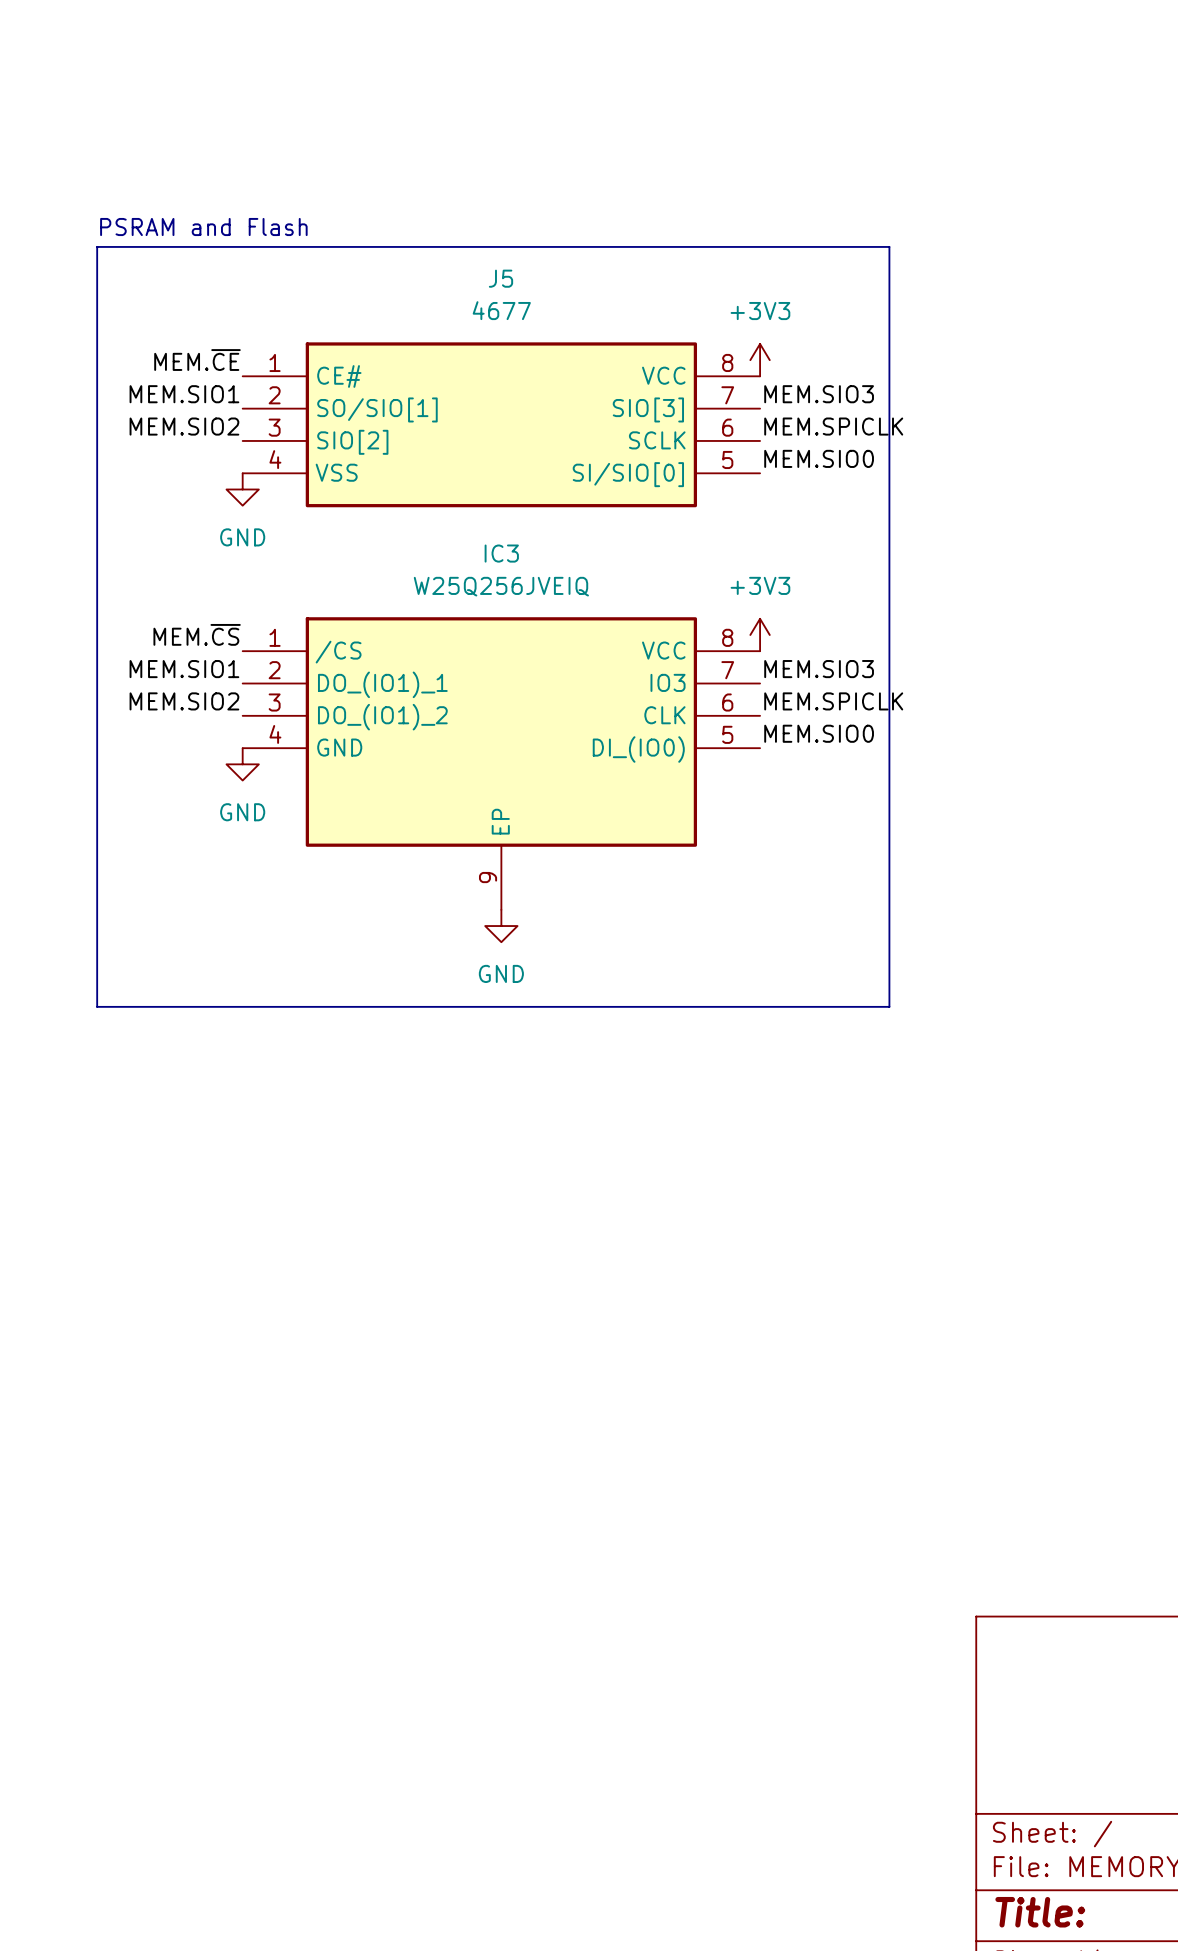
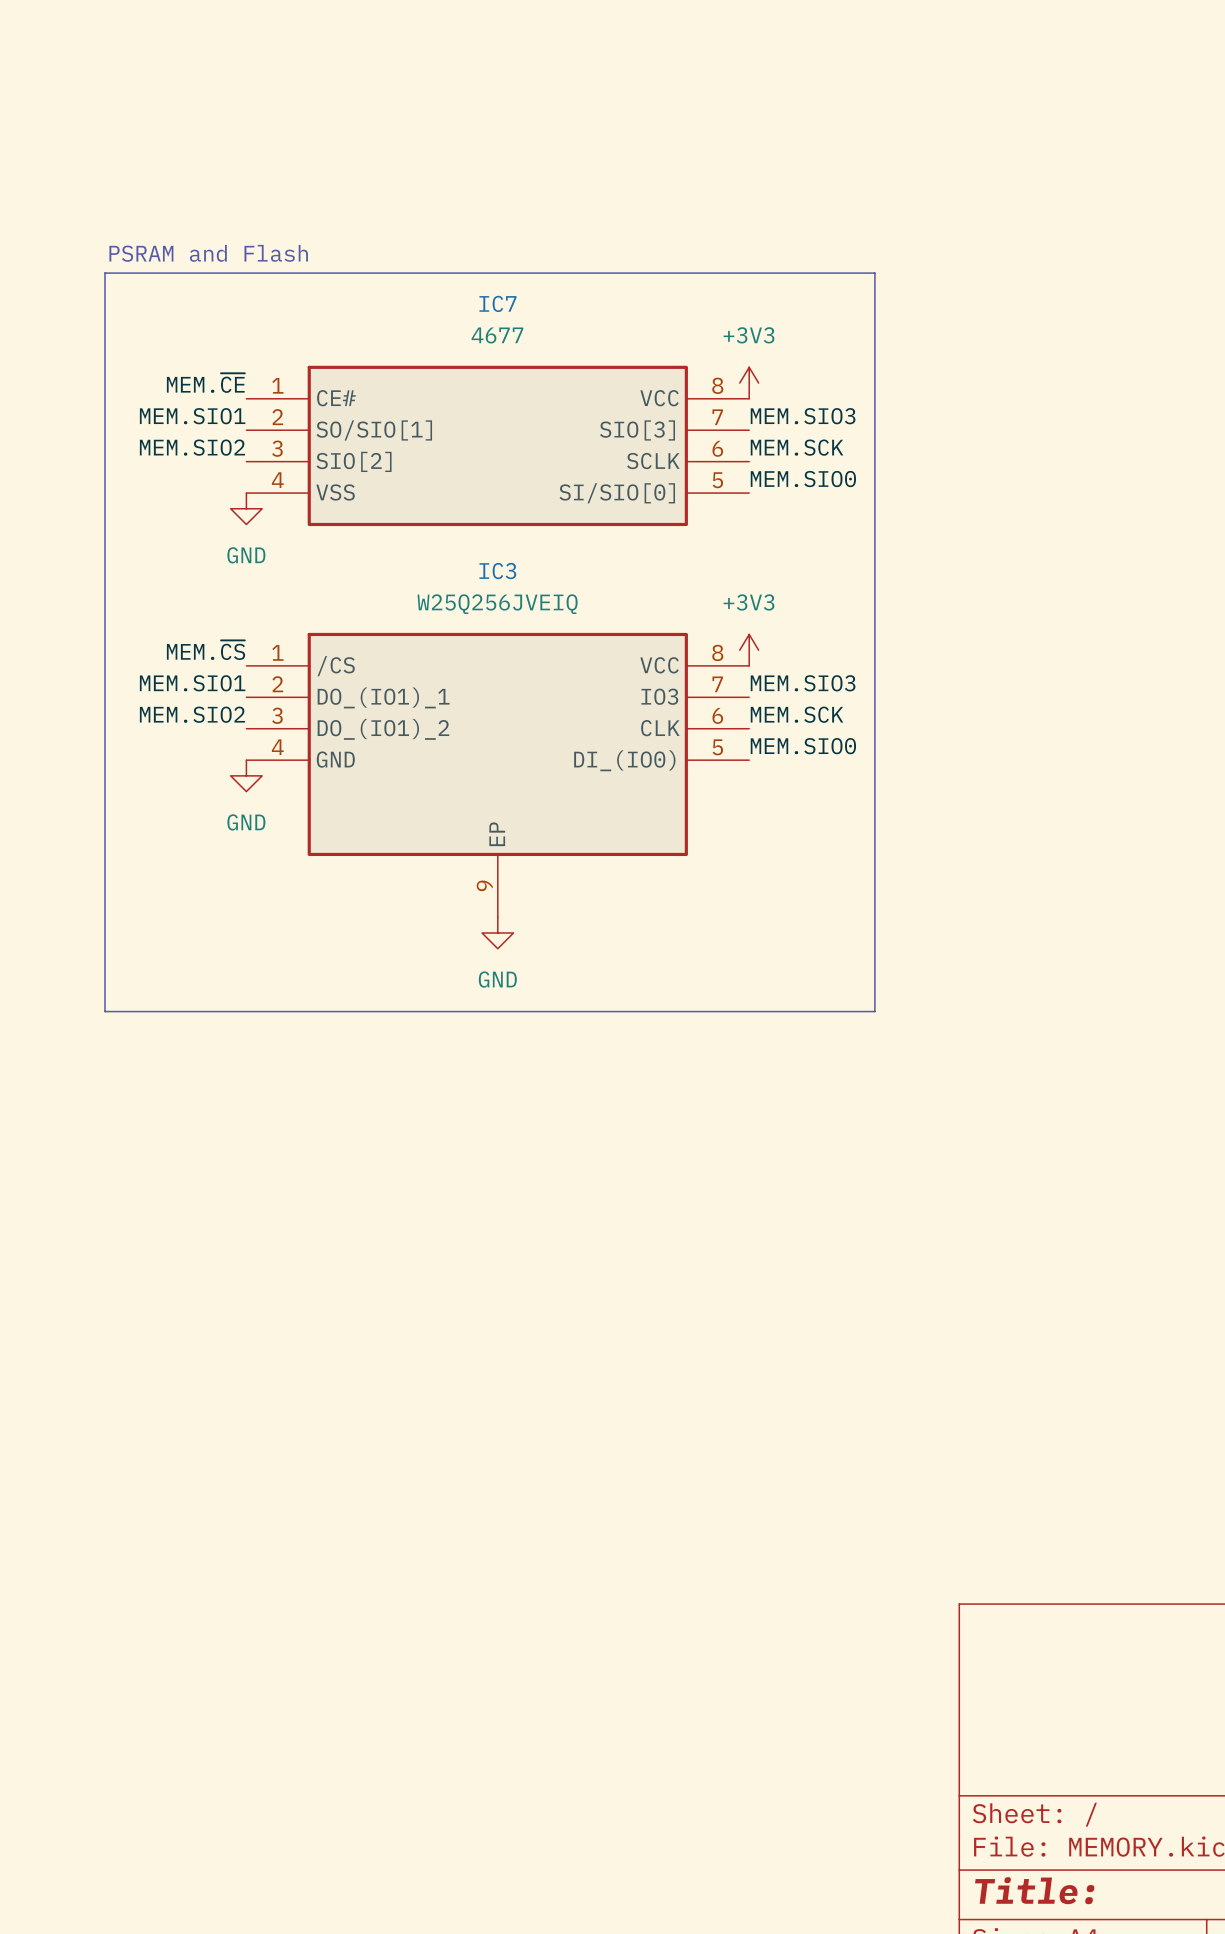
J5 name: J5 (500, 278) -> IC7 (497, 303)
label: MEM.SPICLK (833, 426) -> MEM.SCK (797, 447)
label: MEM.SPICLK (833, 701) -> MEM.SCK (797, 714)

